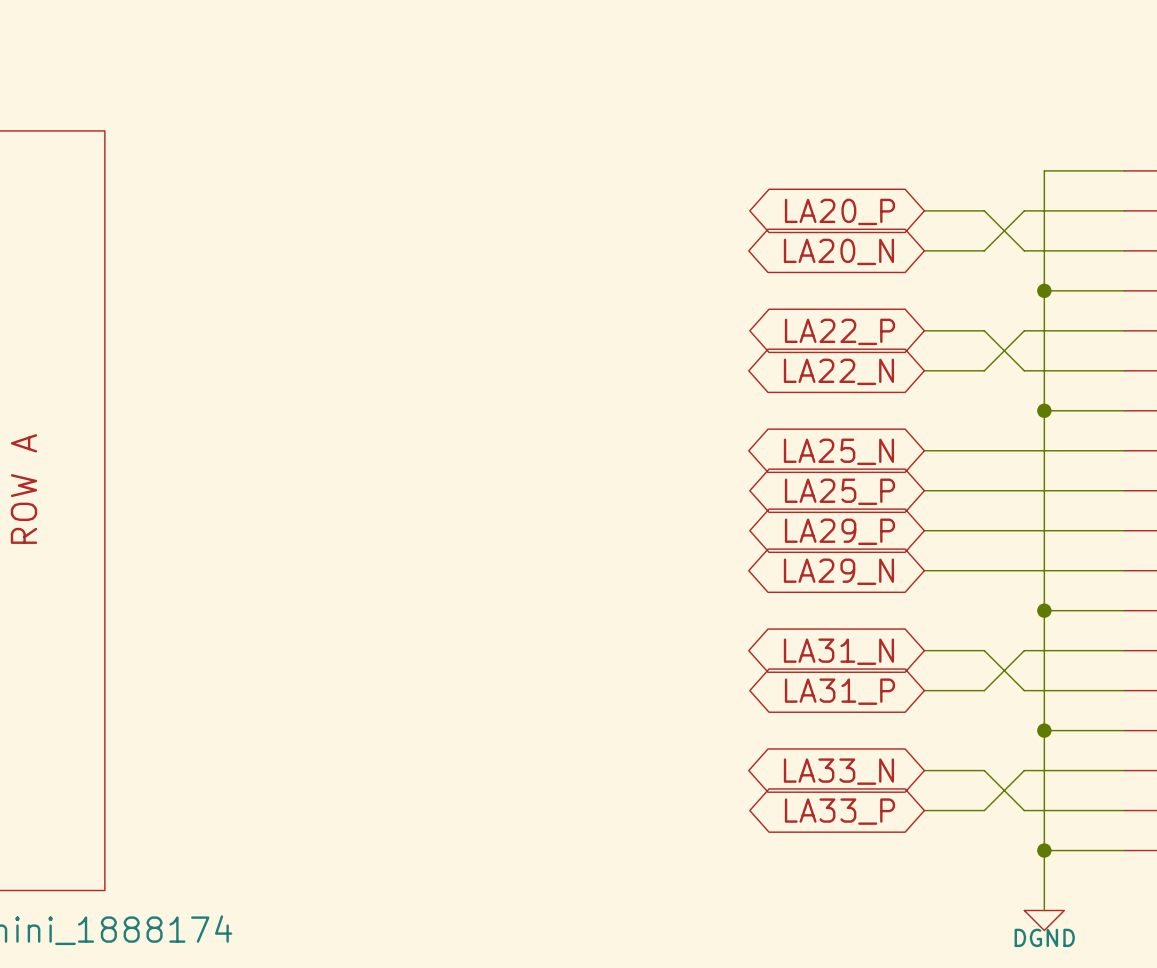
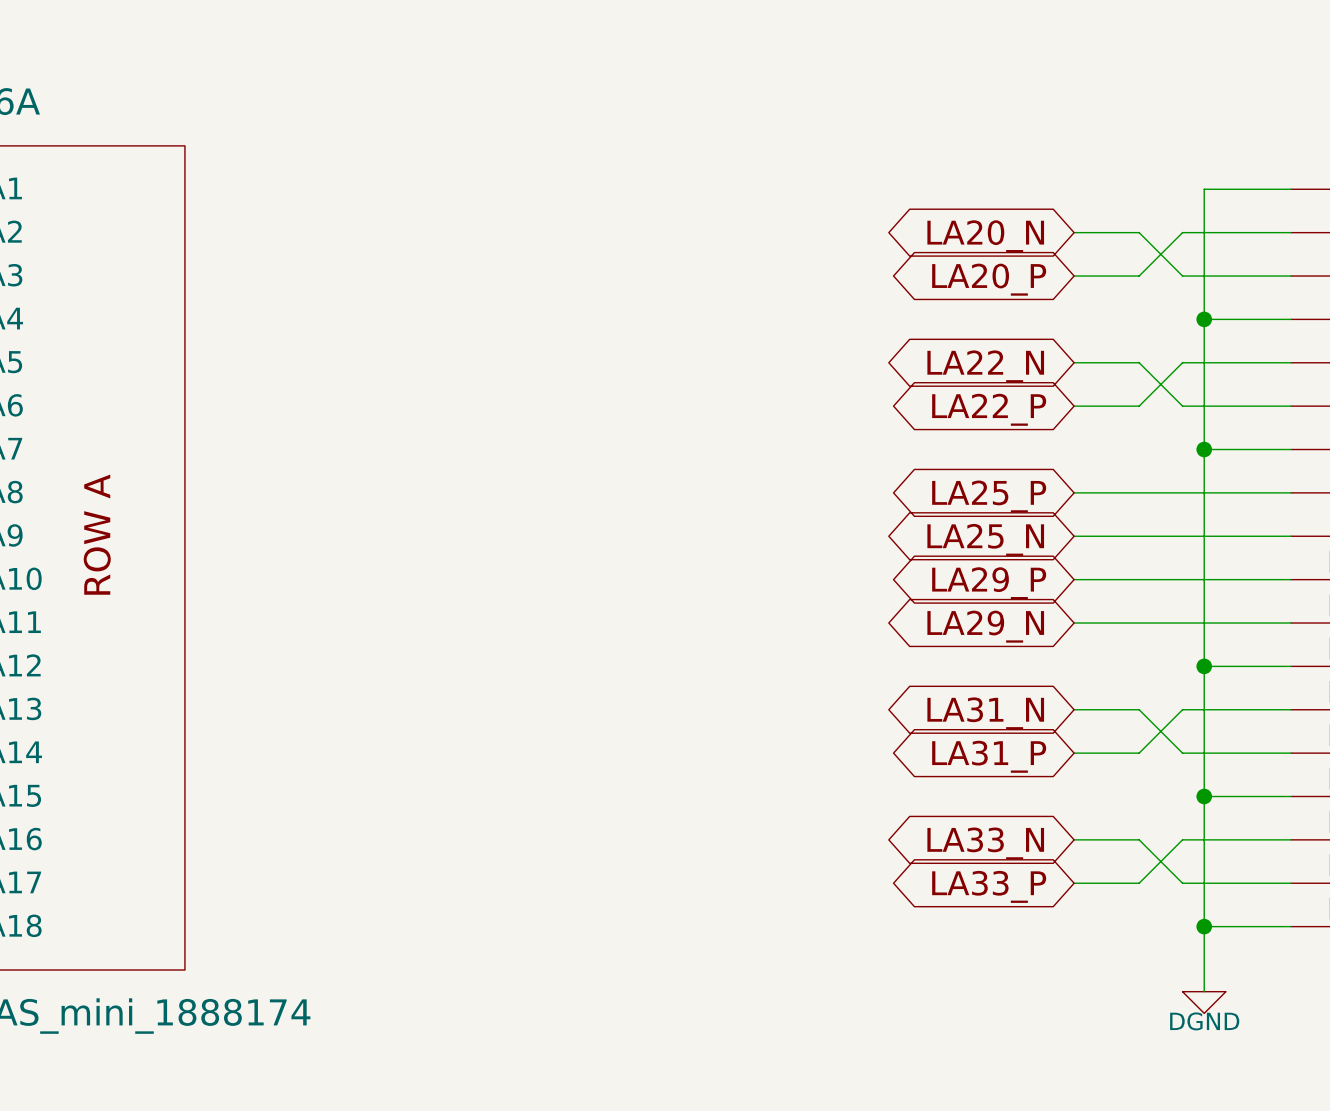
global label: LA20_P (839, 211) -> LA20_N (985, 236)
global label: LA20_N (838, 251) -> LA20_P (989, 279)
global label: LA22_P (839, 331) -> LA22_N (985, 366)
global label: LA22_N (838, 371) -> LA22_P (989, 409)
global label: LA25_N (838, 451) -> LA25_P (989, 496)
global label: LA25_P (839, 491) -> LA25_N (985, 539)

